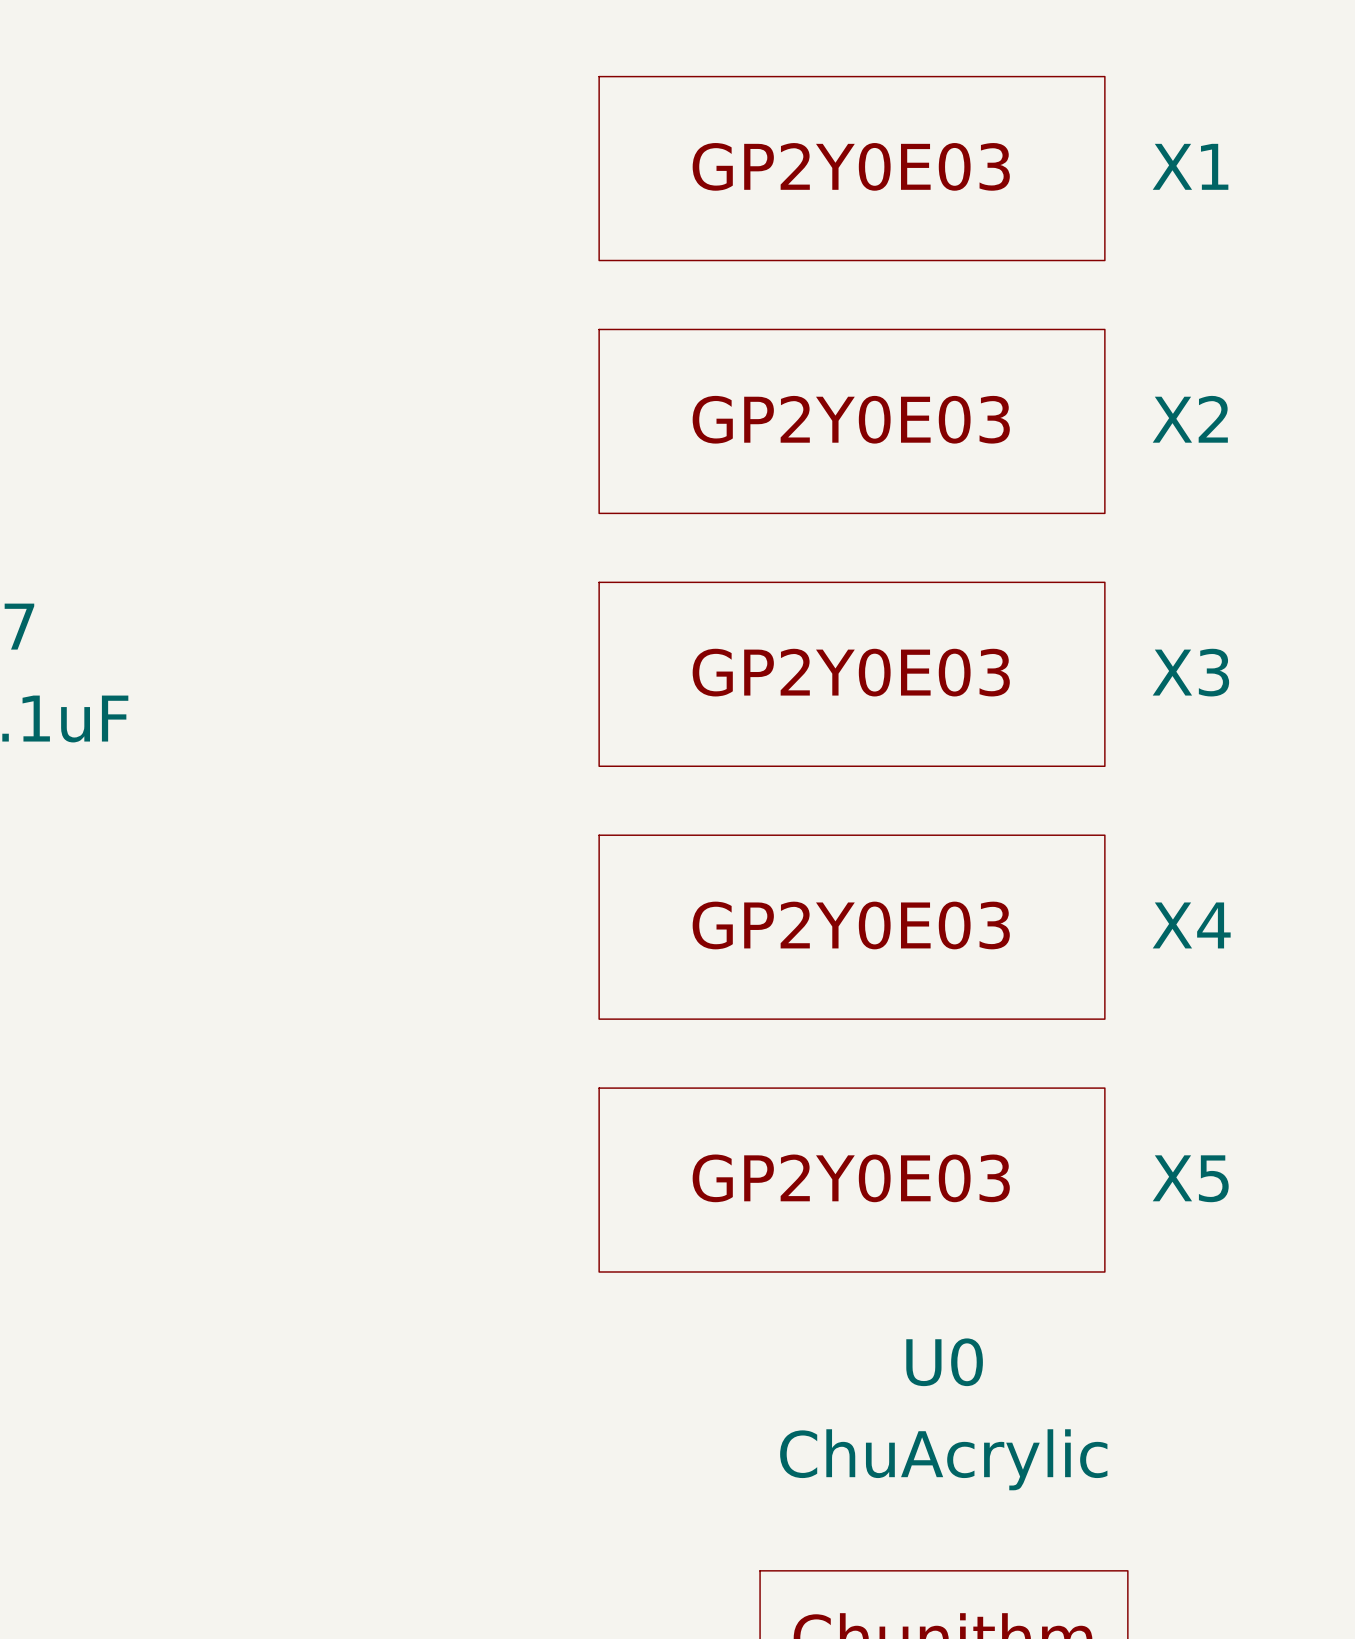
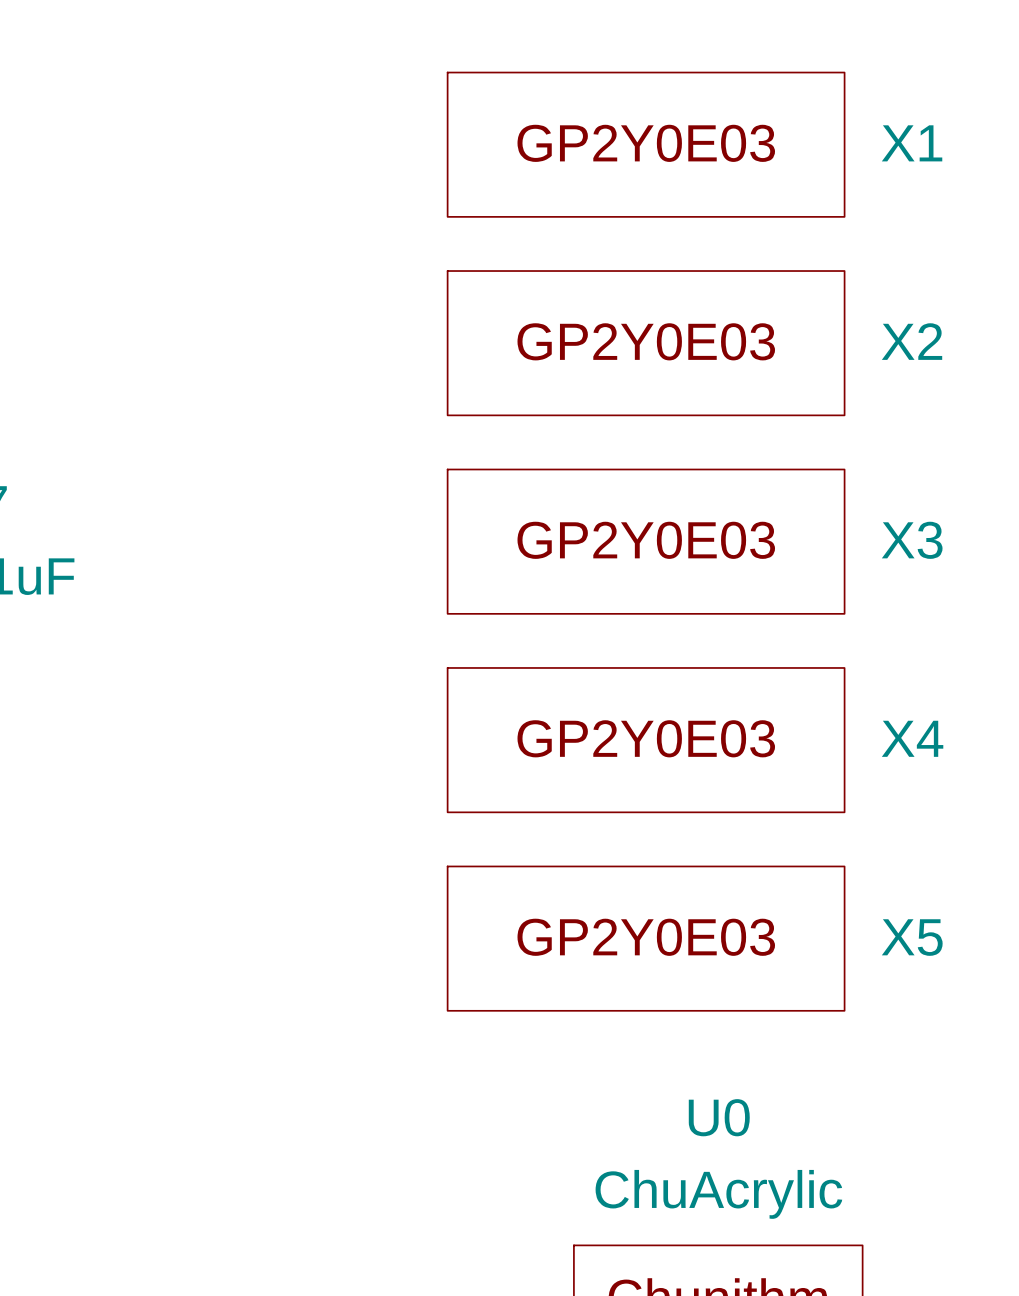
U0 name position: U0 (944, 1362) -> U0 (719, 1117)
U0 value position: ChuAcrylic (943, 1459) -> ChuAcrylic (718, 1194)

